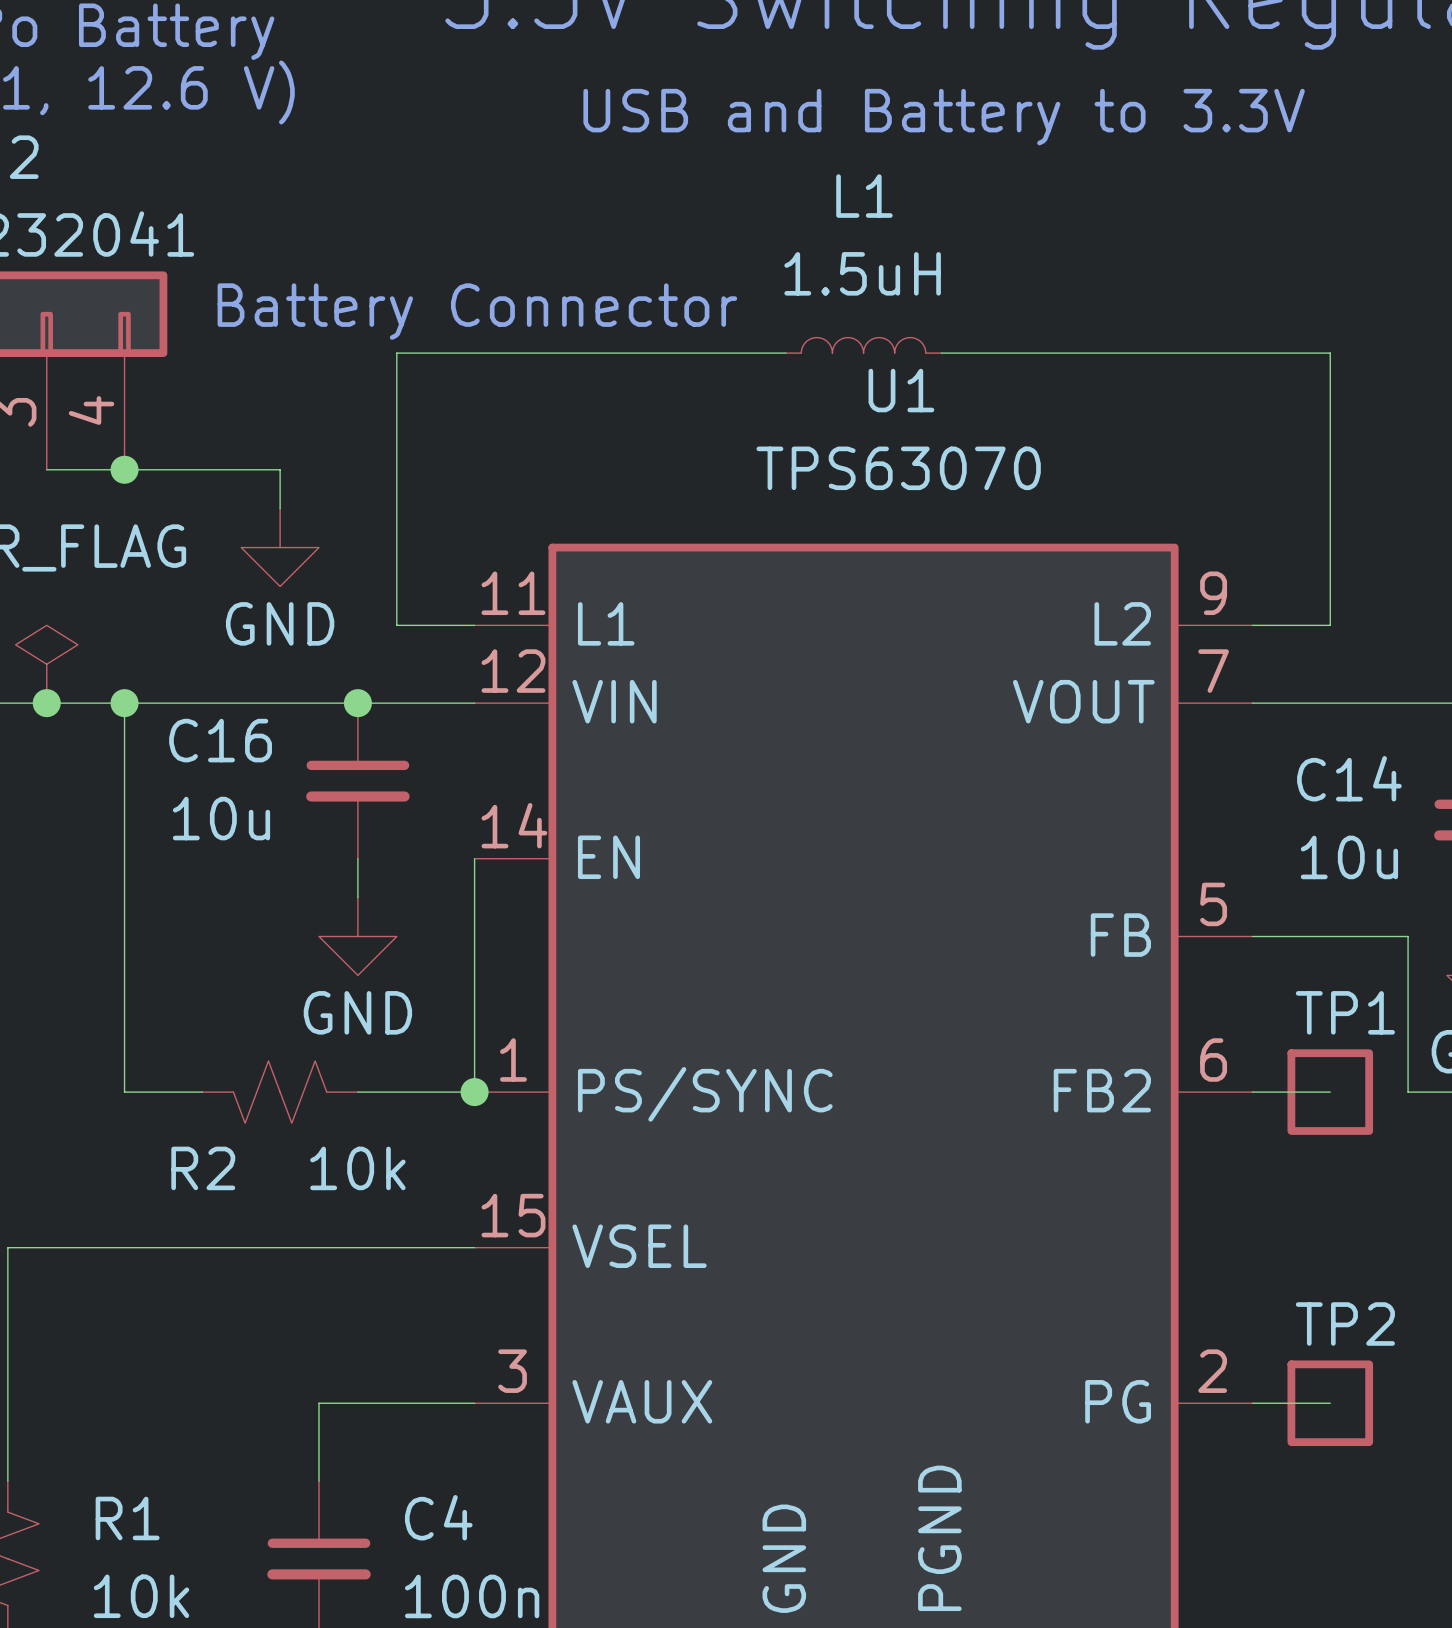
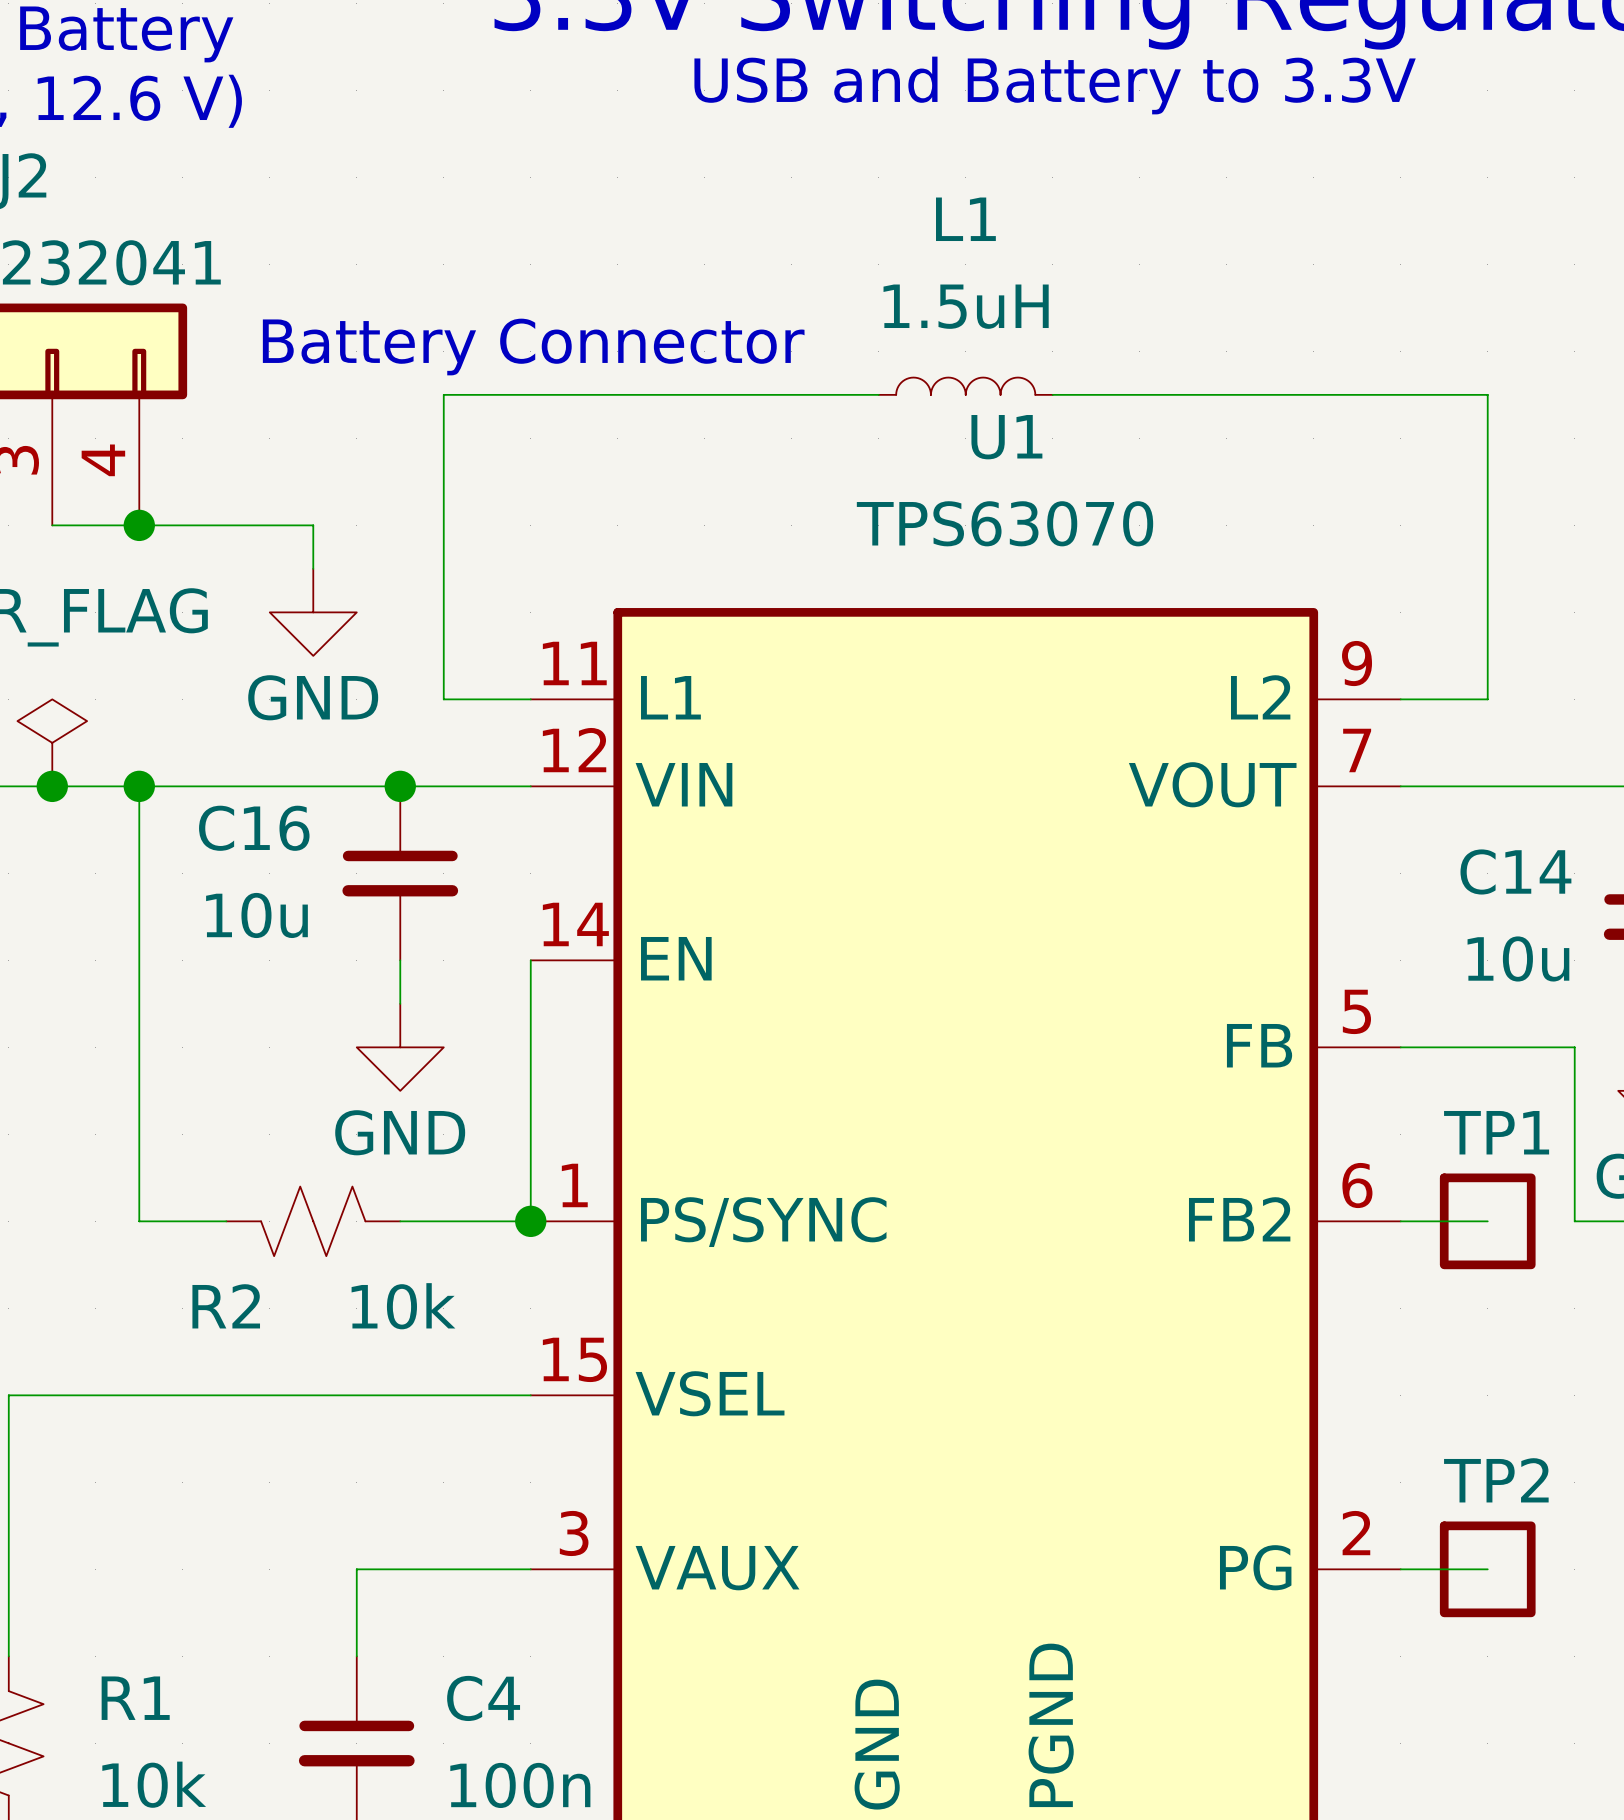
text position: USB and Battery to 3.3V (944, 117) -> USB and Battery to 3.3V (1055, 85)

